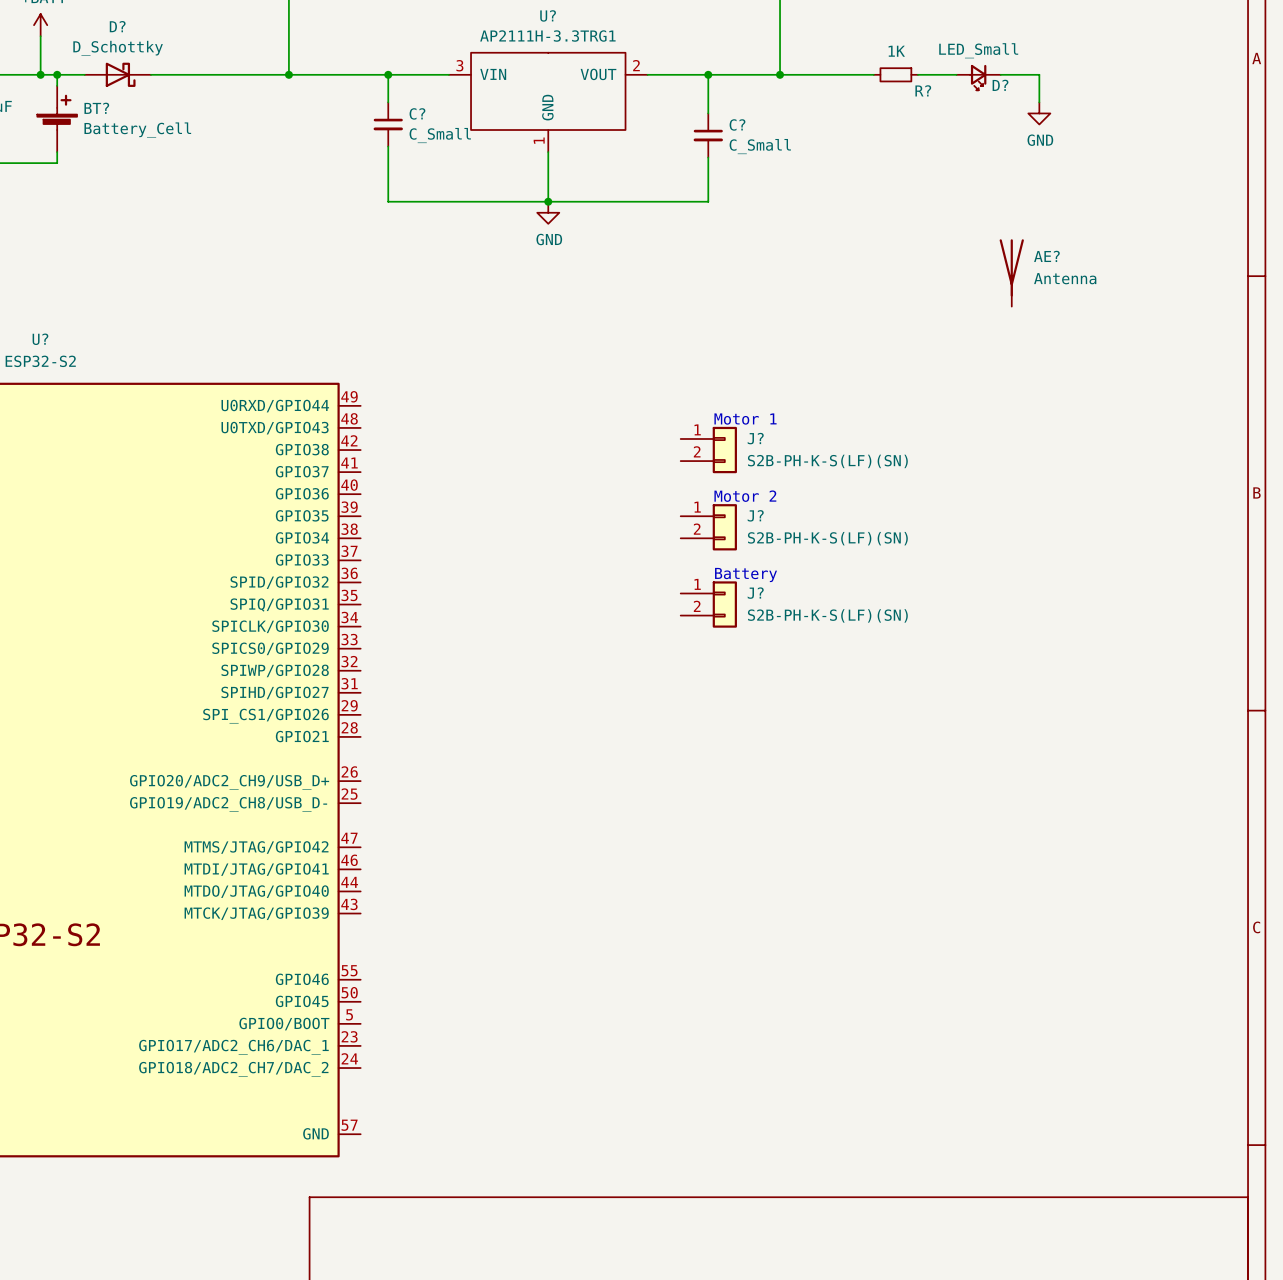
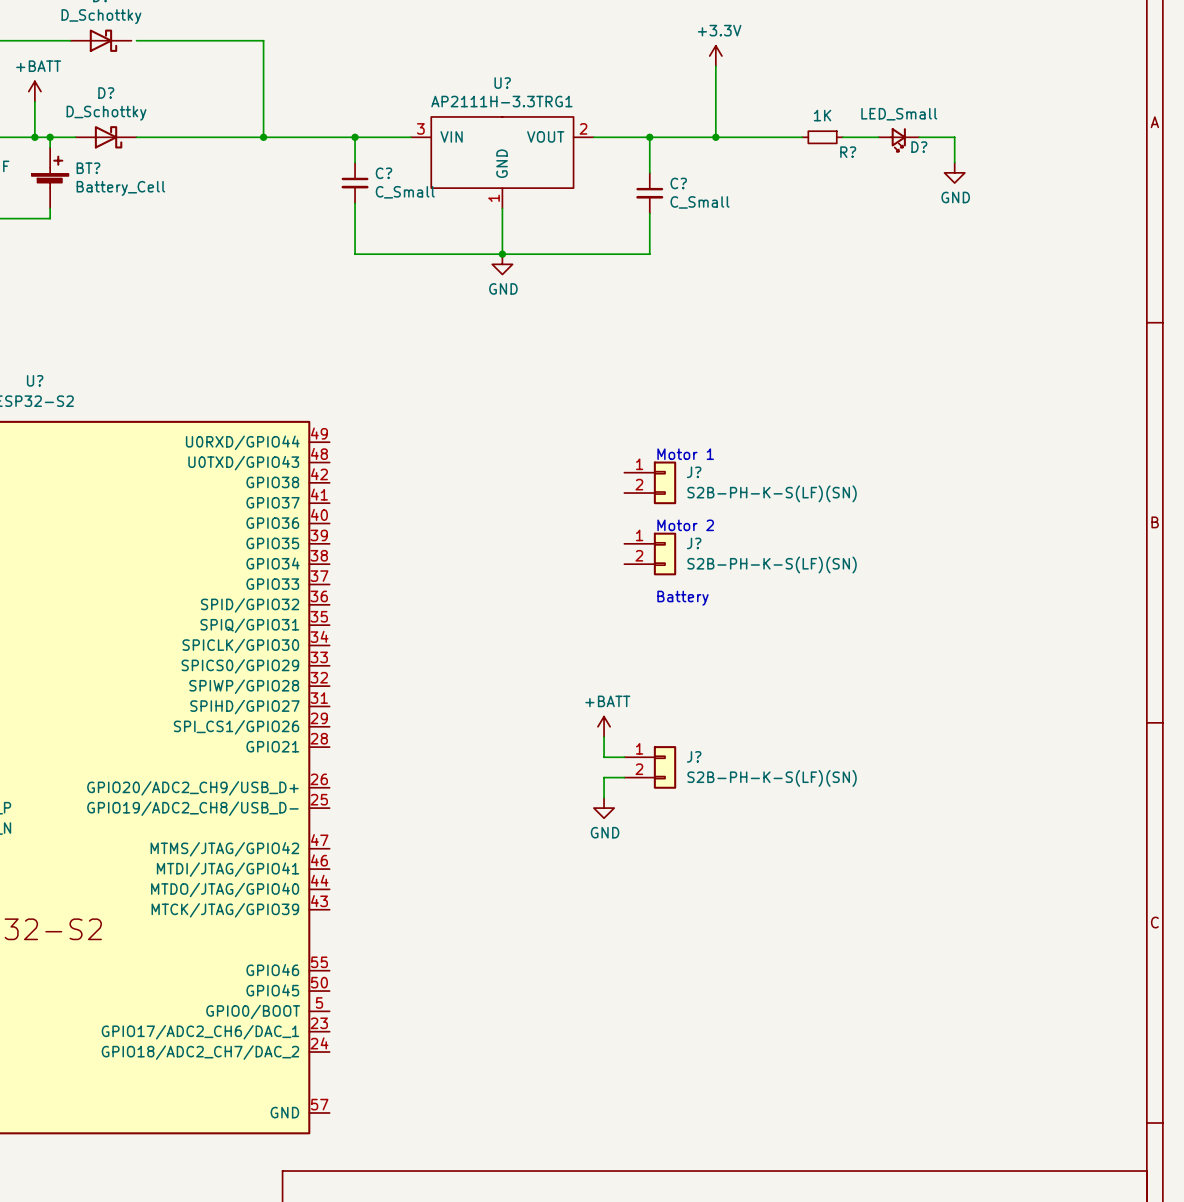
AE?: Antenna (1011, 272) -> none
J? position: (708, 604) -> (650, 767)
power symbol: none -> +BATT (604, 726)
wire: none -> (604, 736) (604, 757) (624, 757)
wire: none -> (624, 777) (604, 777) (604, 797)
power symbol: none -> GND (604, 808)

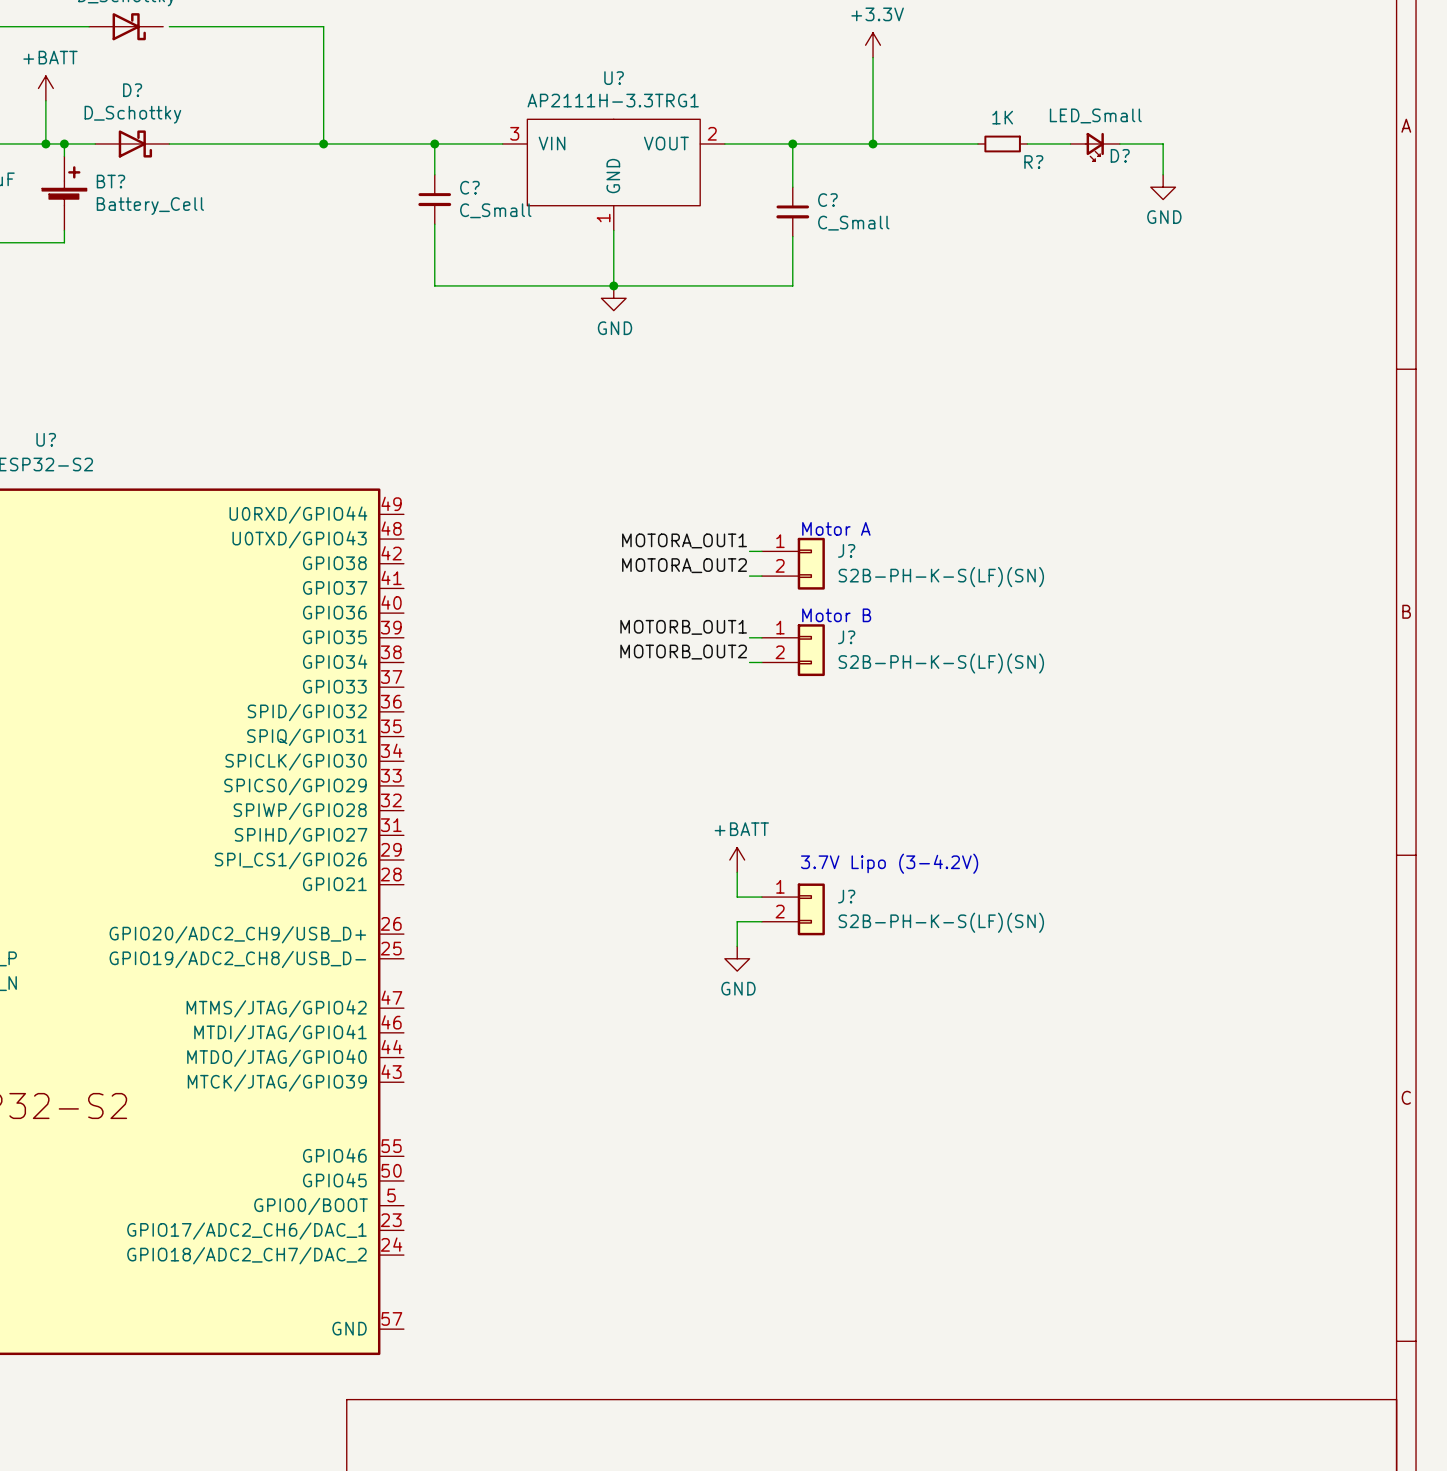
text: Motor 1 (685, 454) -> Motor A (836, 528)
label: none -> MOTORA_OUT1 (684, 540)
wire: none -> (749, 551) (761, 551)
label: none -> MOTORA_OUT2 (684, 565)
wire: none -> (749, 576) (761, 576)
text: Motor 2 (685, 525) -> Motor B (836, 615)
label: none -> MOTORB_OUT1 (683, 627)
wire: none -> (749, 637) (761, 637)
label: none -> MOTORB_OUT2 (683, 652)
wire: none -> (749, 662) (761, 662)
text: Battery (683, 598) -> none
text: none -> 3.7V Lipo (3-4.2V) (889, 863)

